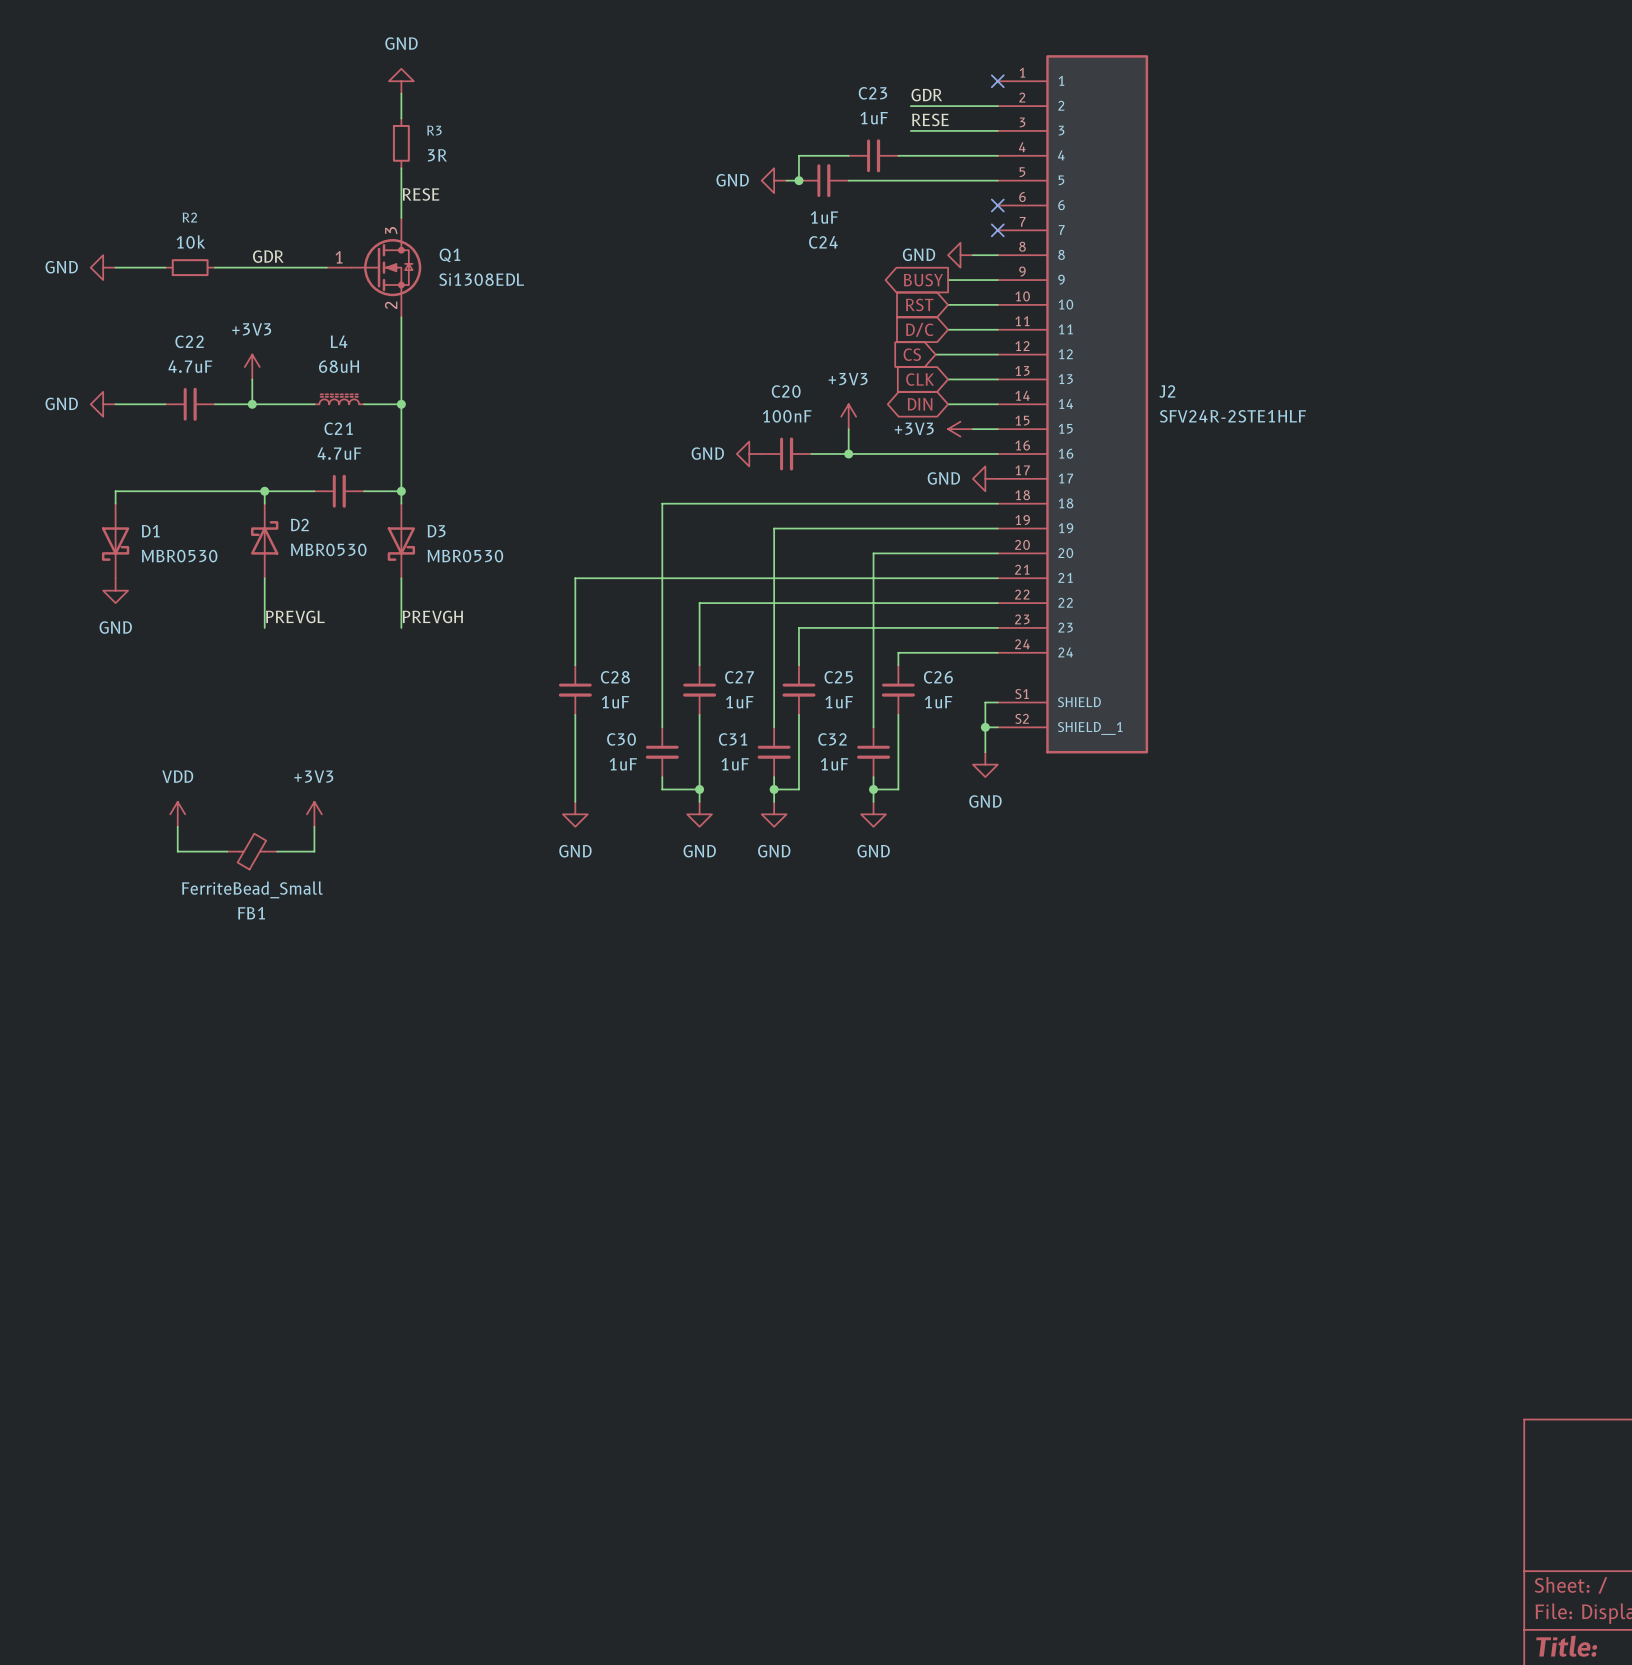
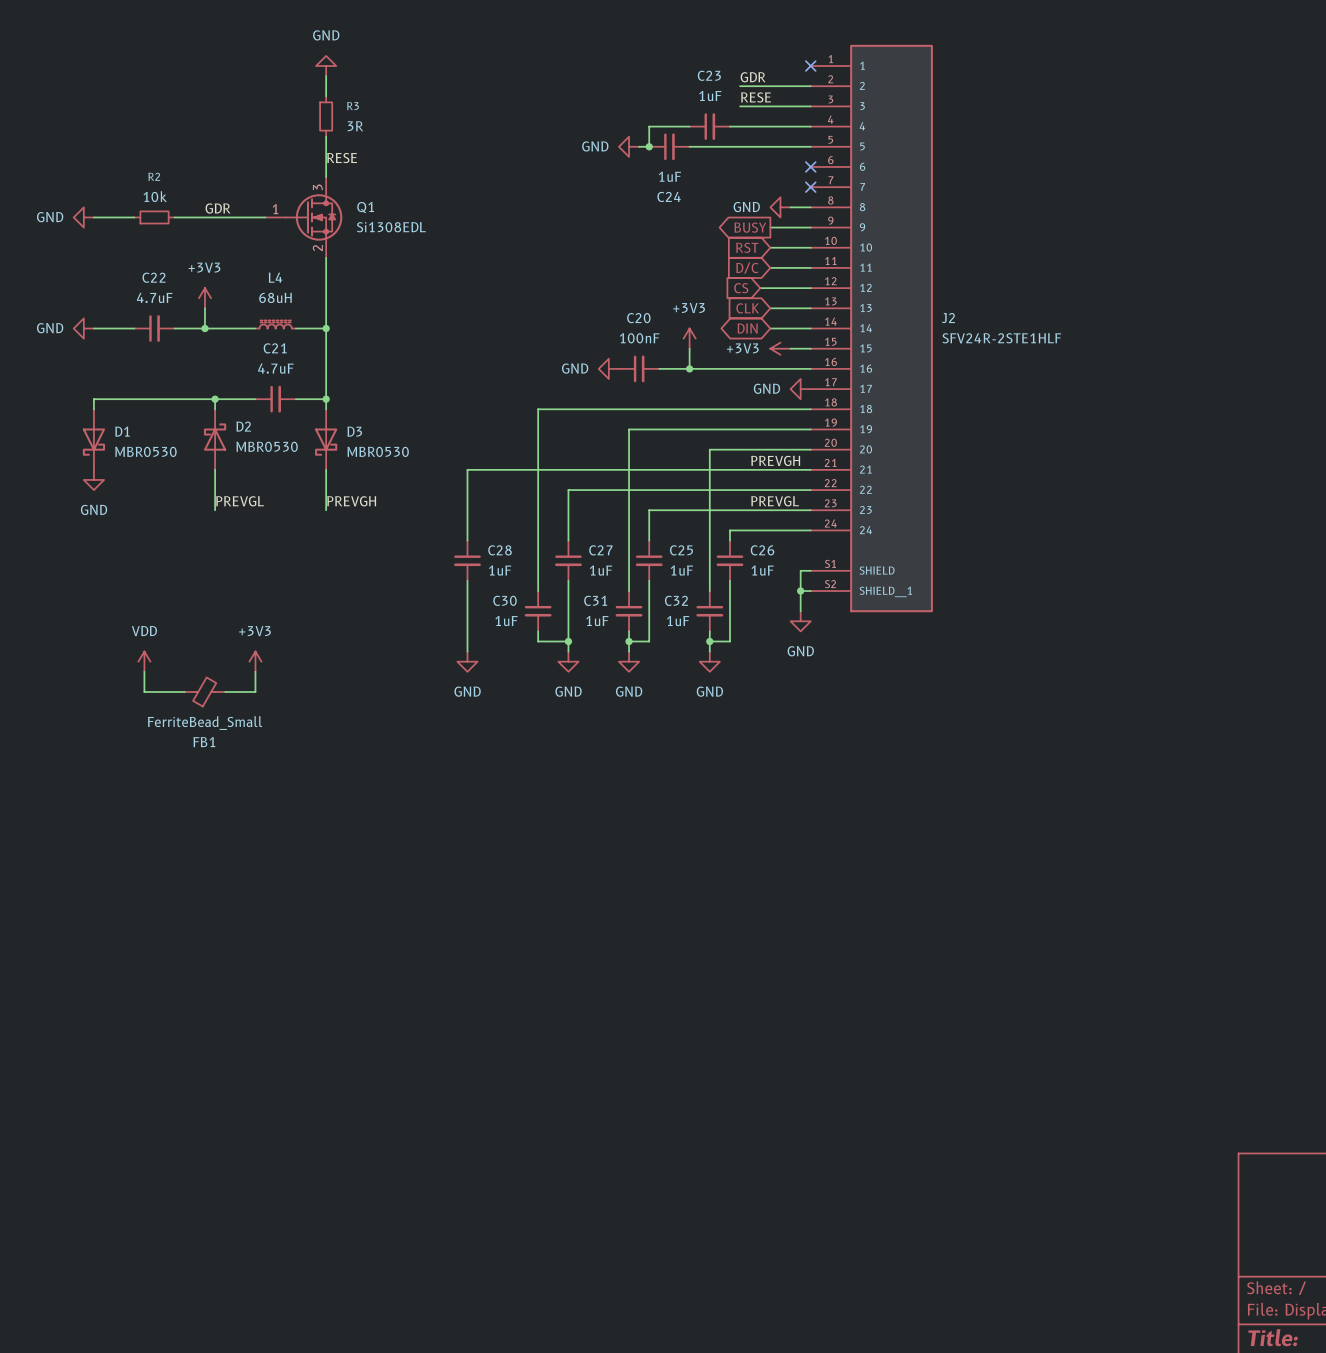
label: none -> PREVGH (775, 460)
label: none -> PREVGL (775, 501)

